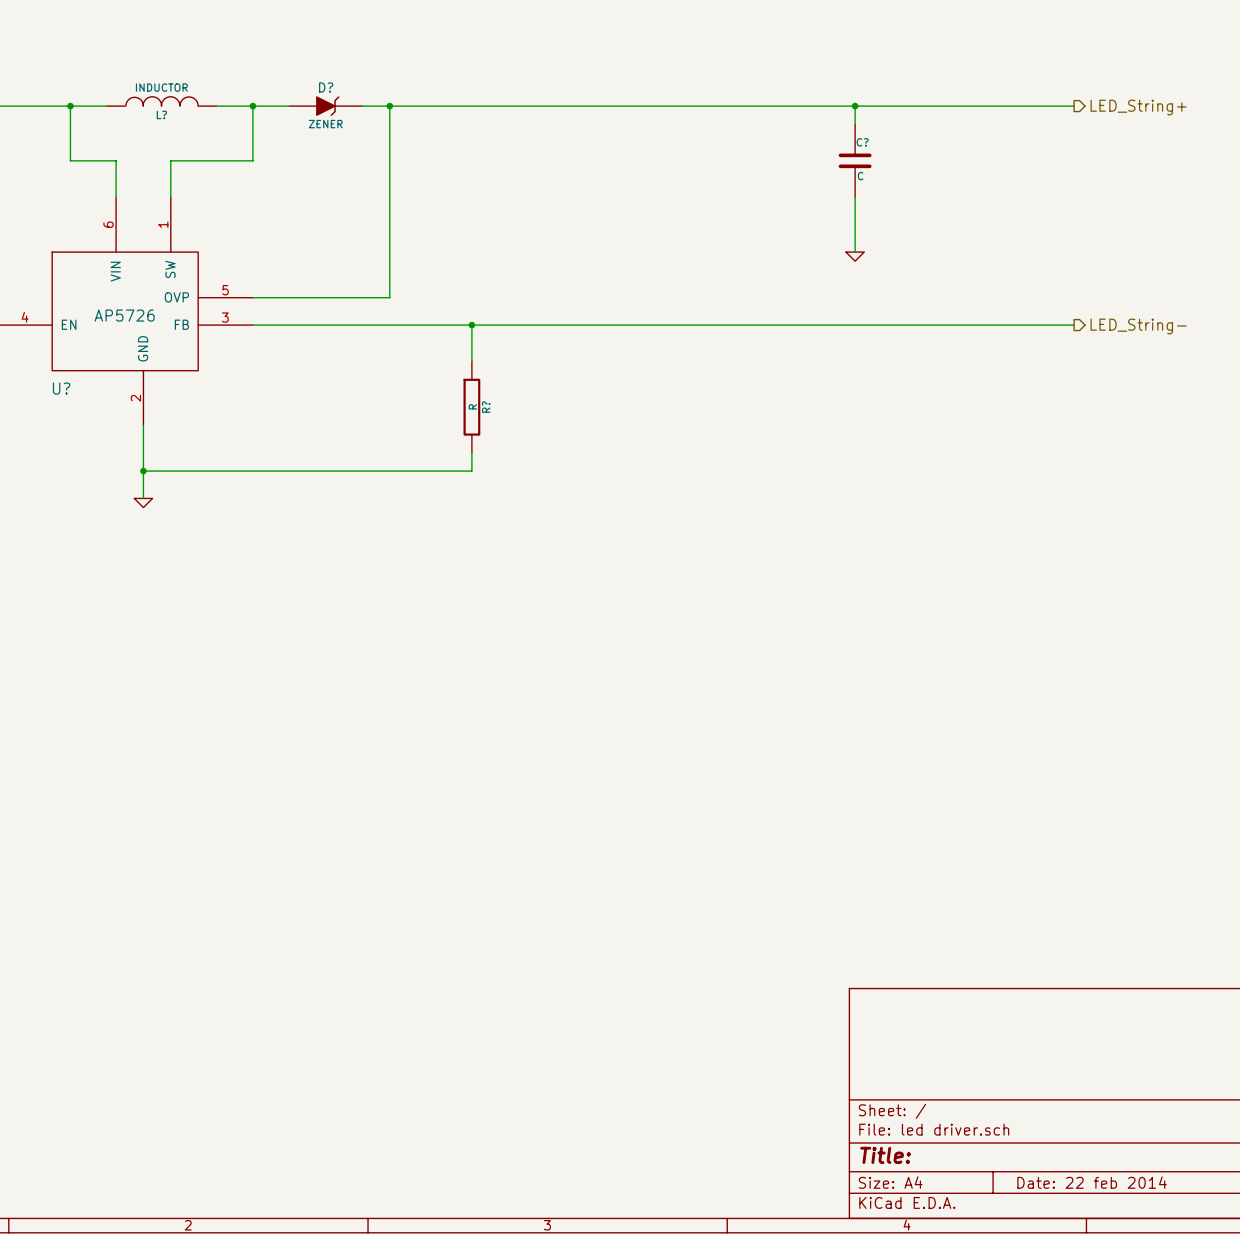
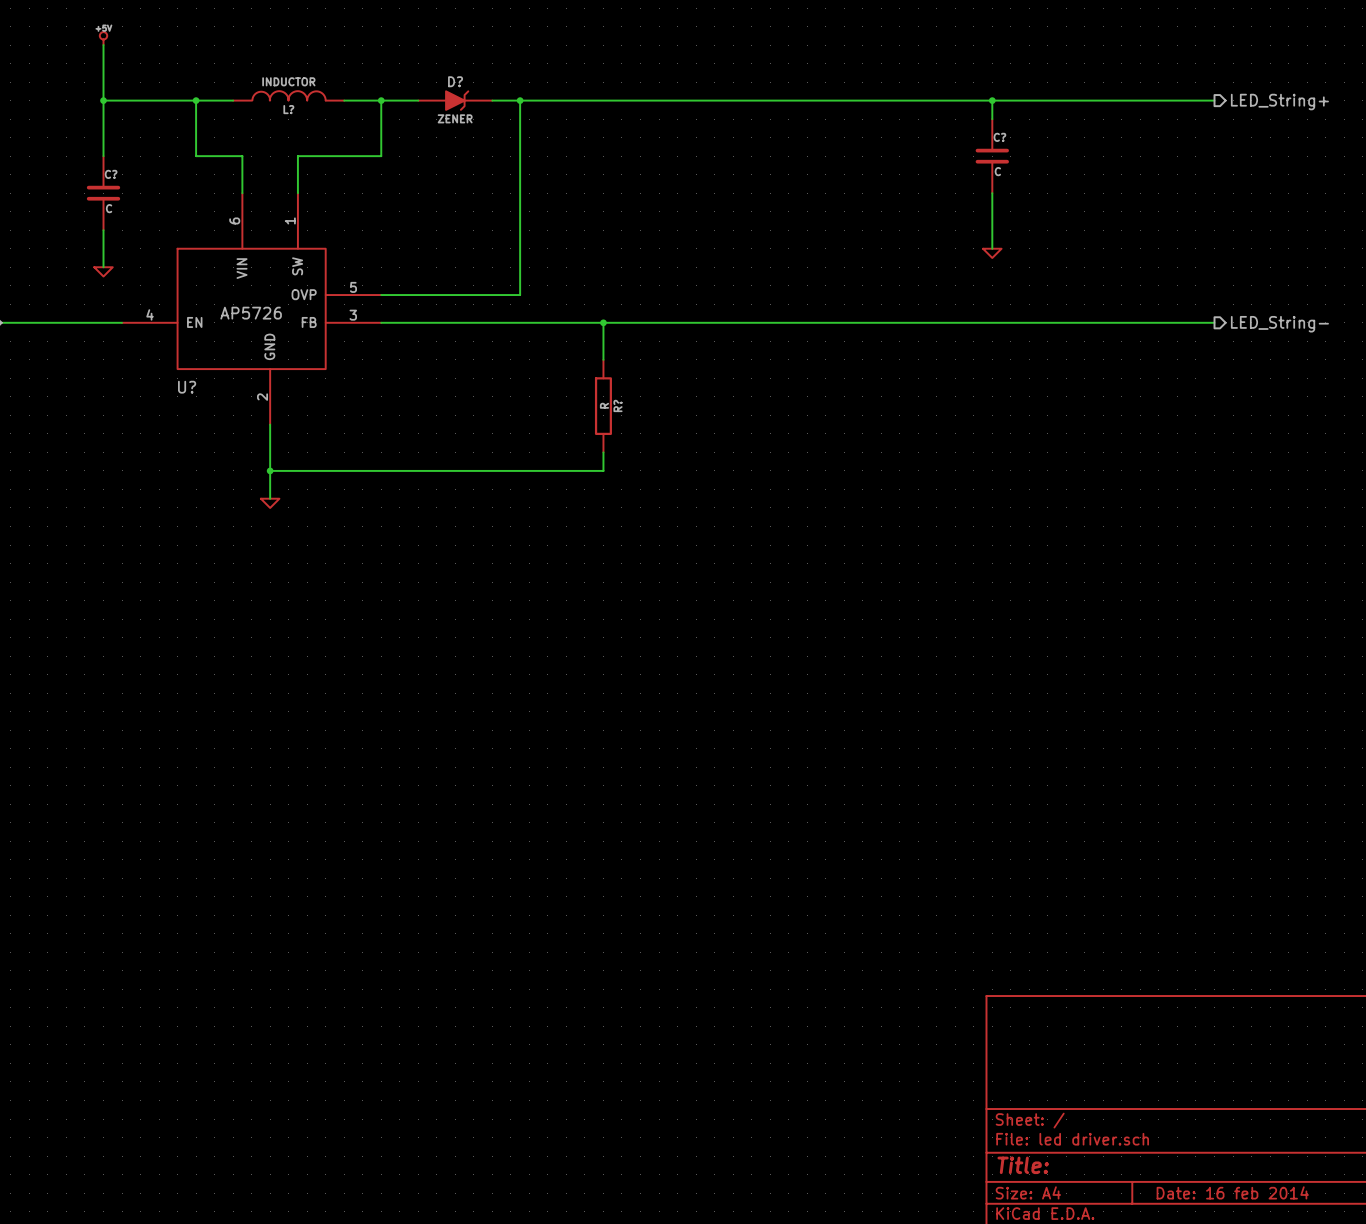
title block: Date: 22 feb 2014 (1092, 1182) -> Date: 16 feb 2014 (1232, 1192)

